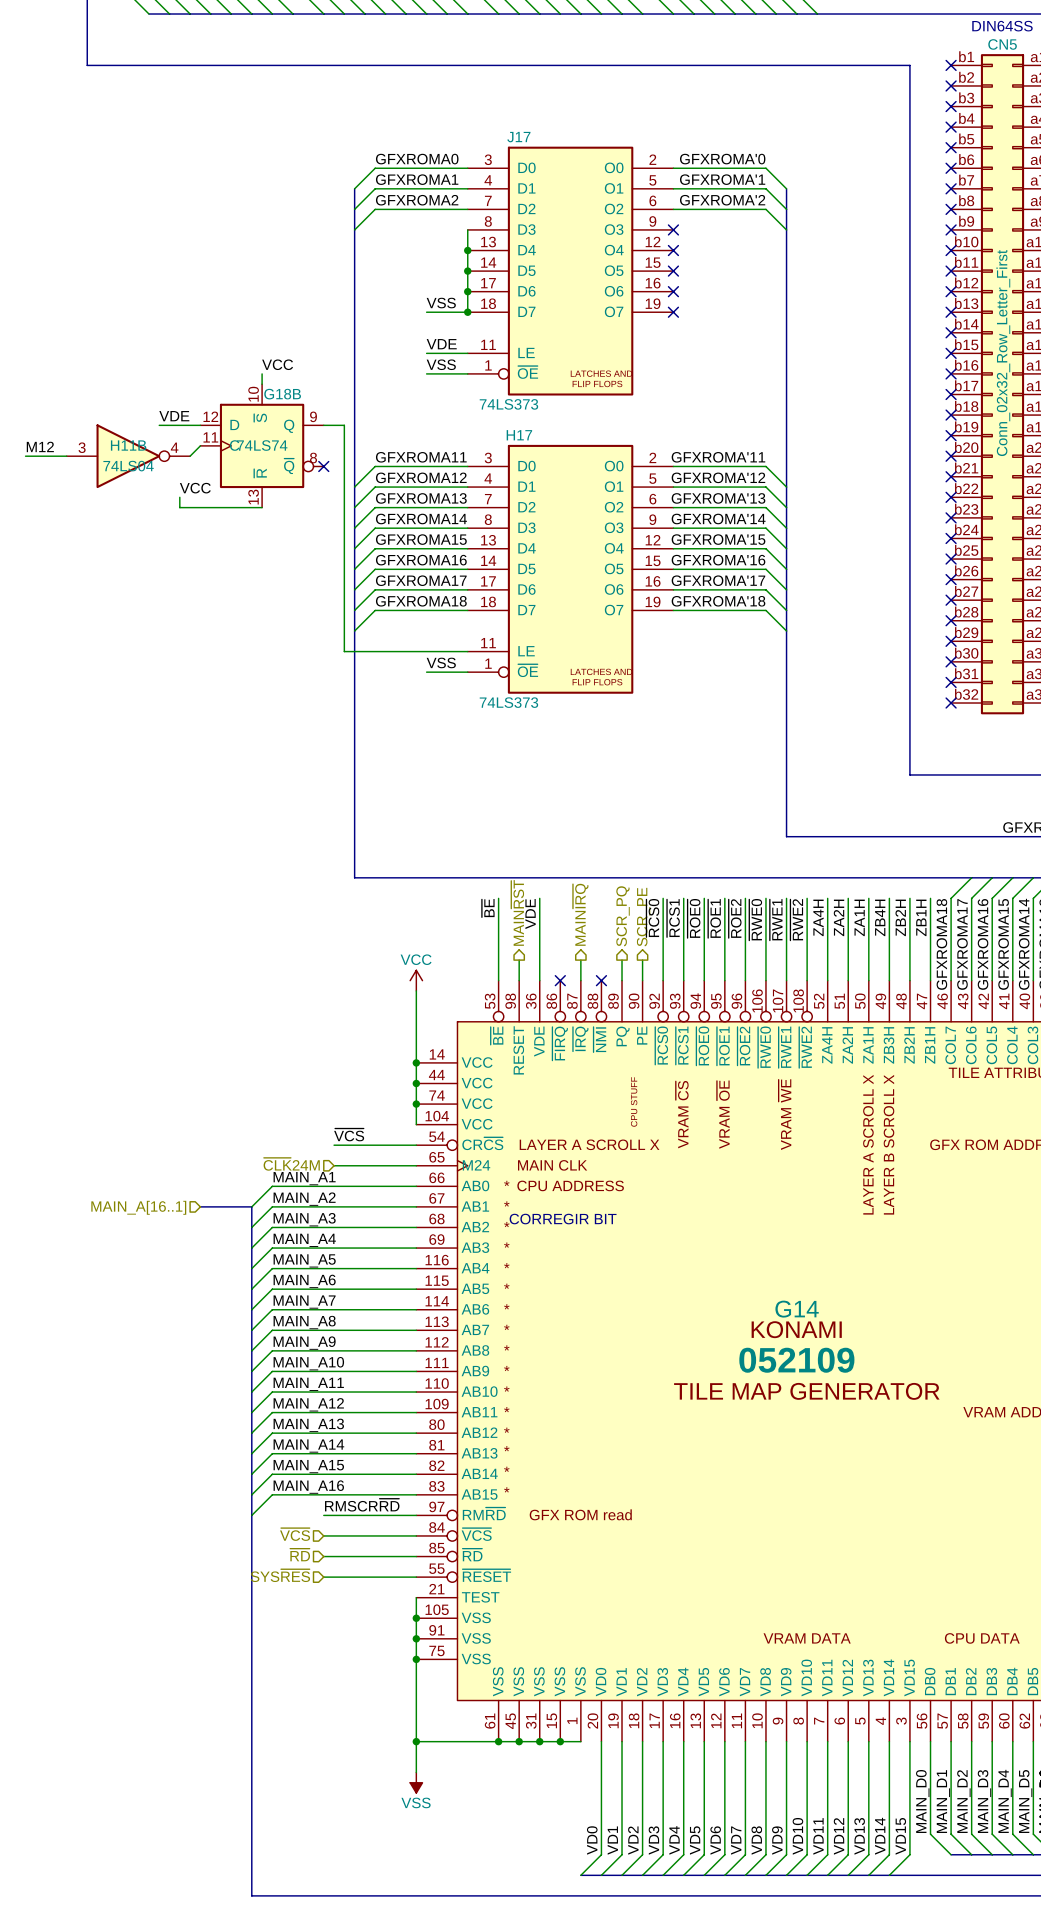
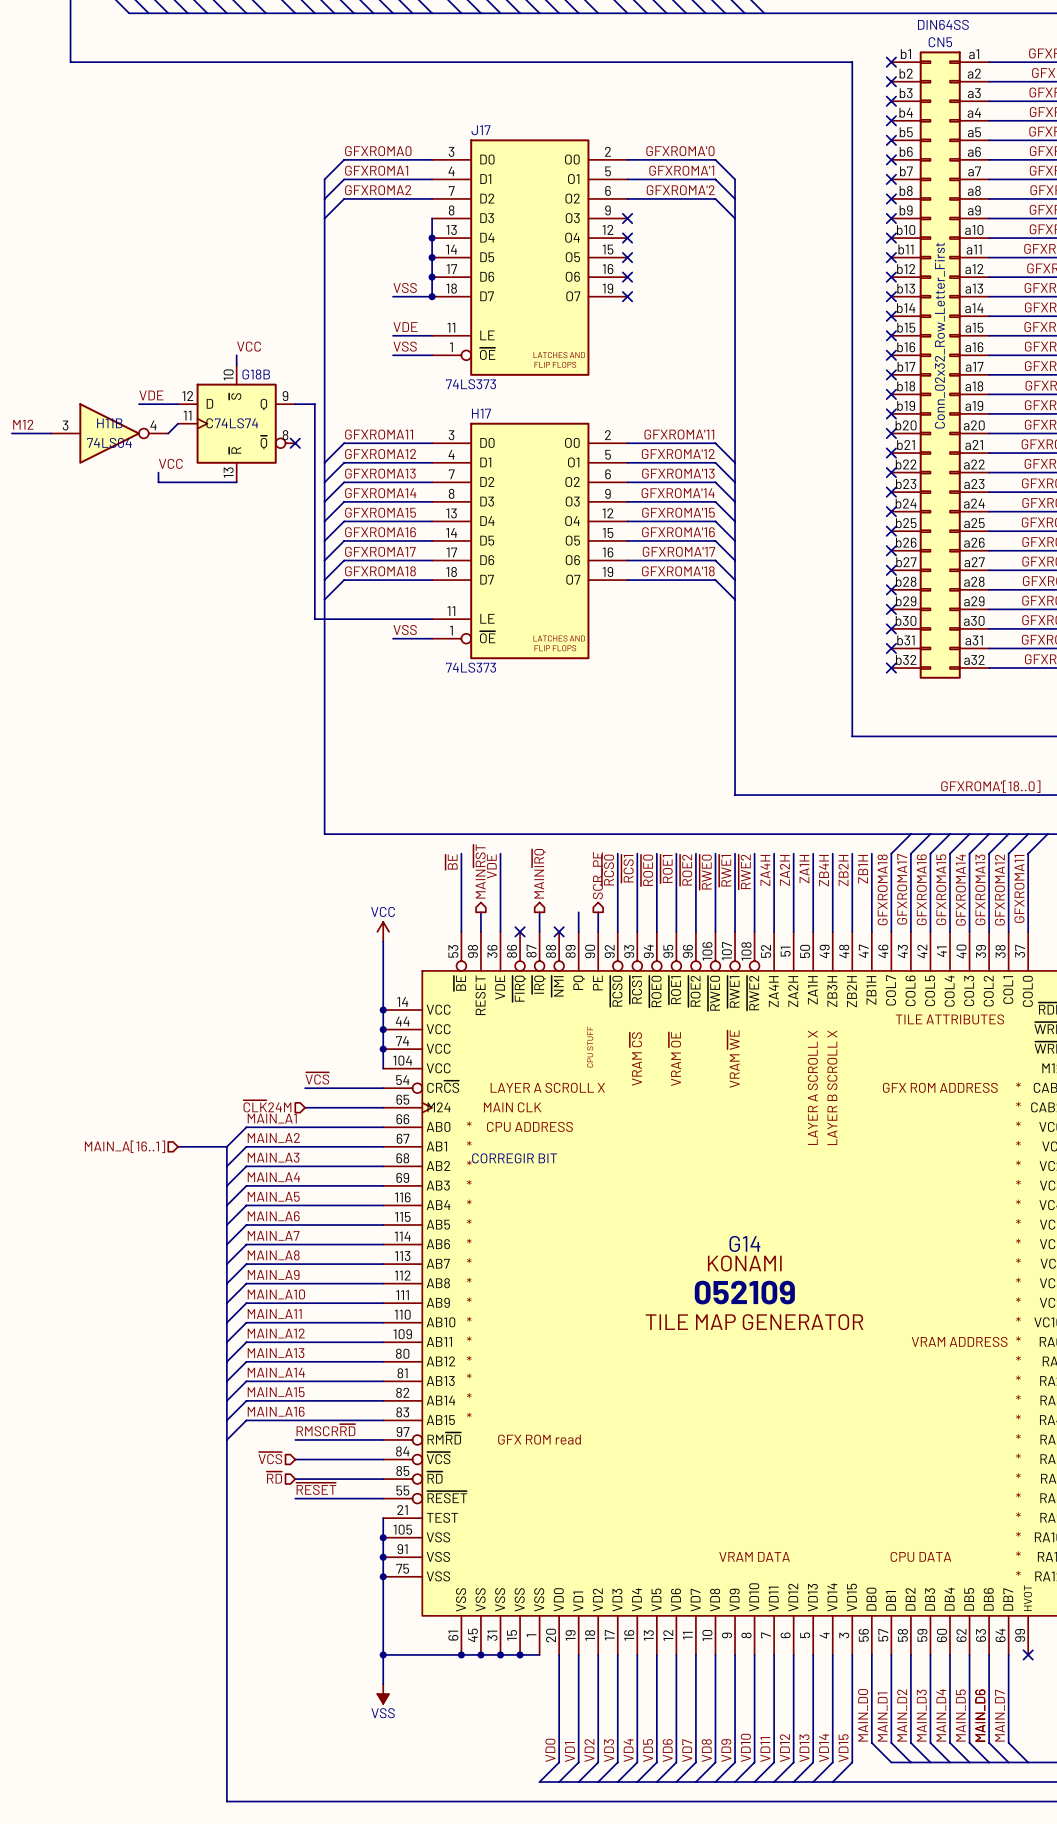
hierarchical label: SCR_PQ (623, 916) -> none
label: none -> ~{RESET} (316, 1488)
hierarchical label: SYS~{RES} (280, 1575) -> none

